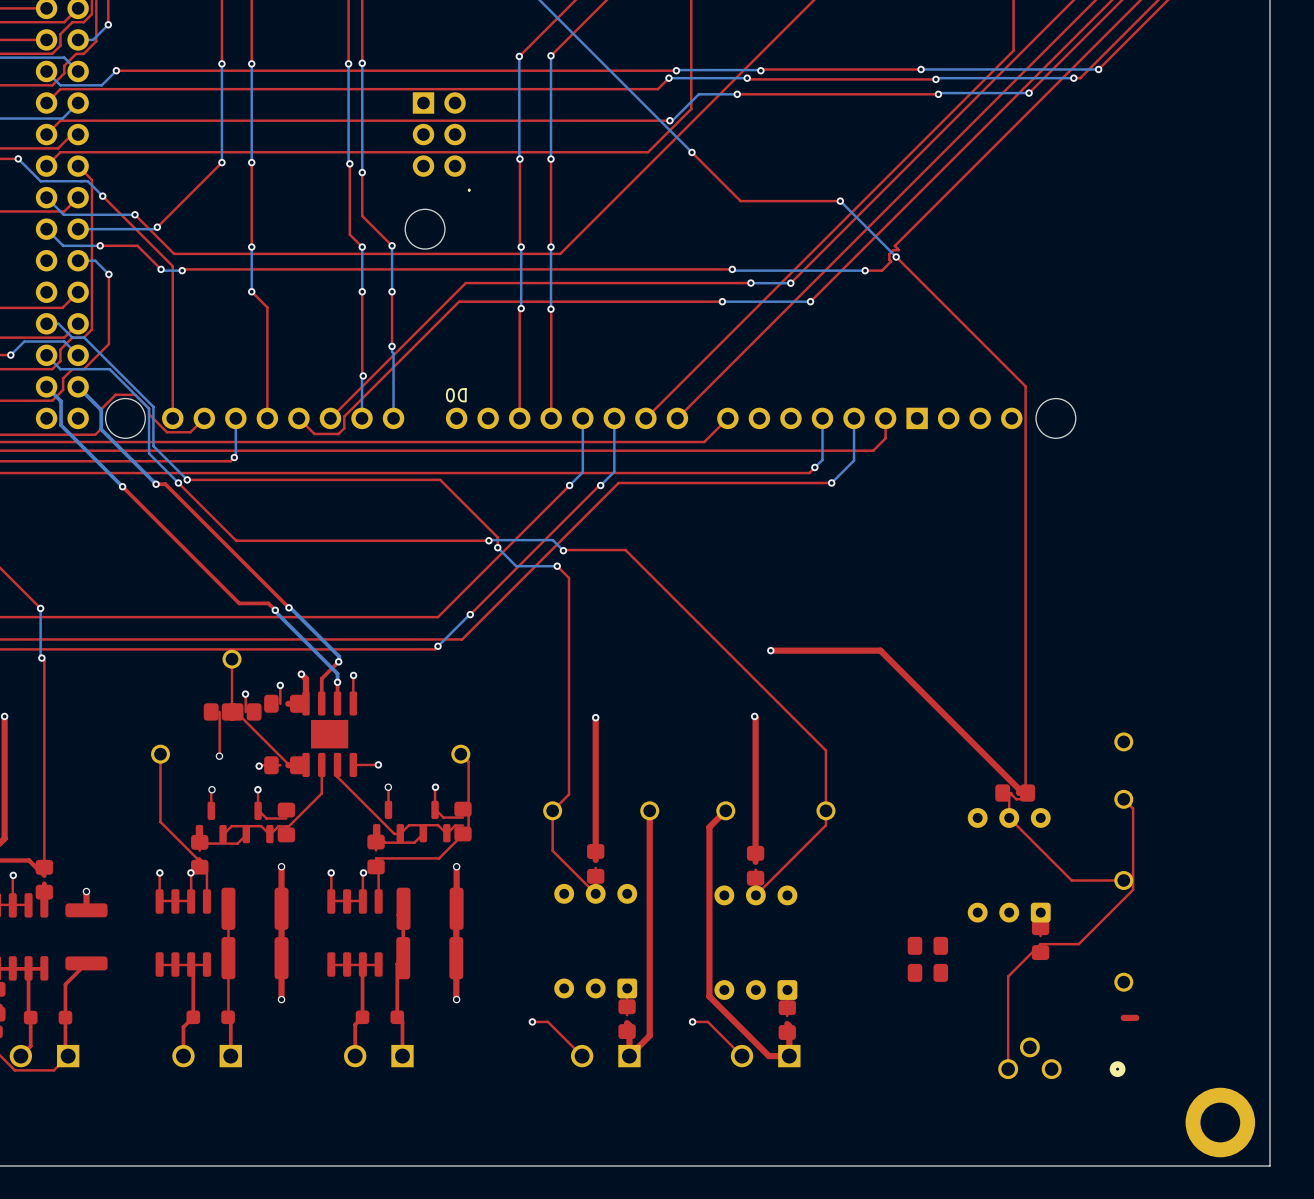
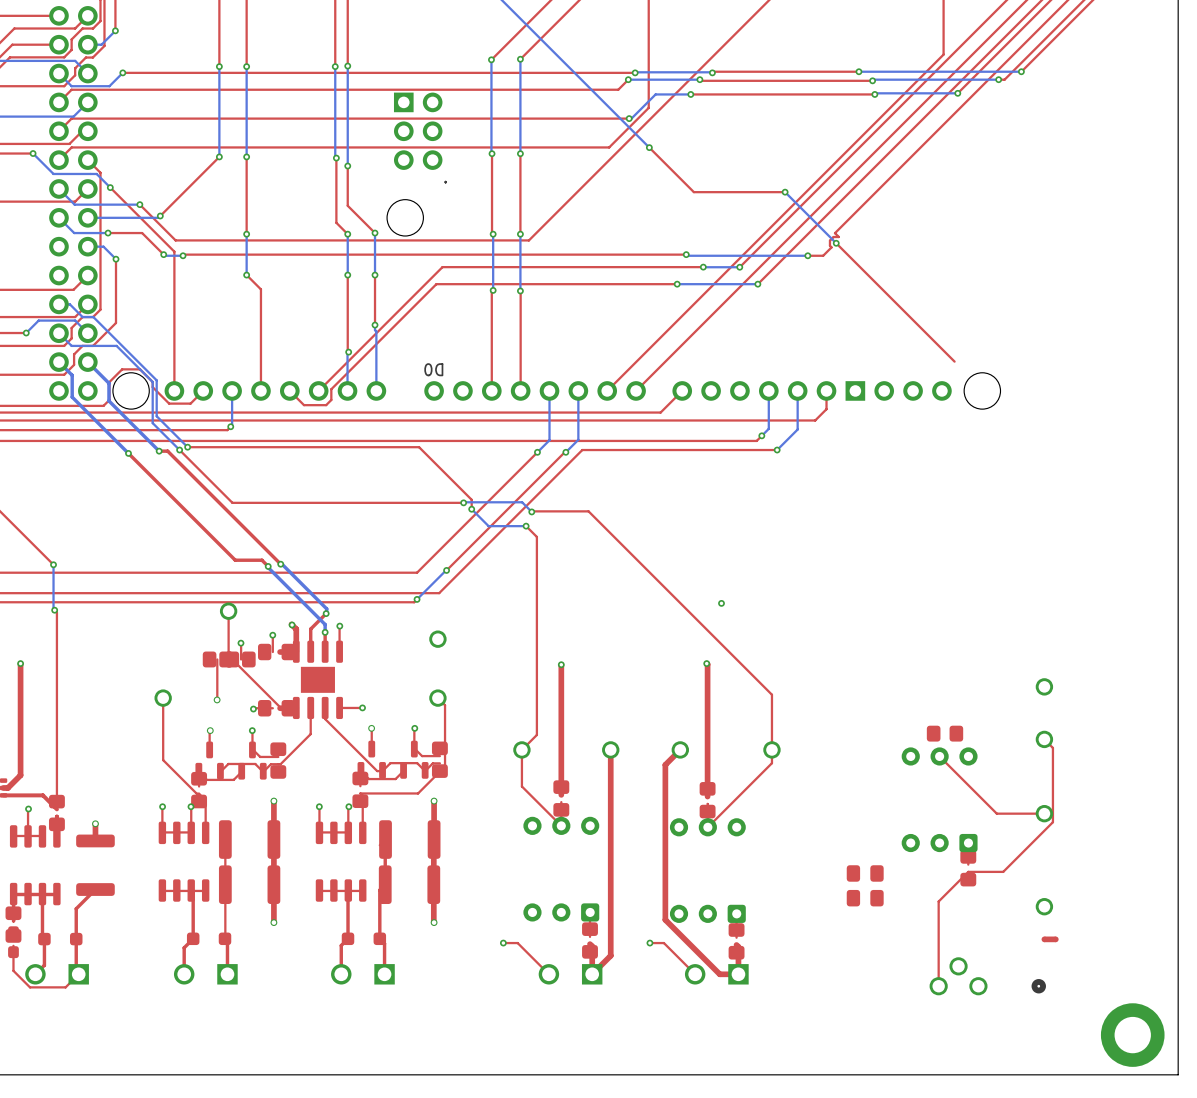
top track: (1025, 386) (1025, 795) -> none
top track: (770, 650) (880, 650) (1019, 789) (1019, 793) -> none
part: none -> (437, 639)
top track: (1021, 799) (1016, 799) (1011, 793) (1009, 794) (1009, 817) -> none

